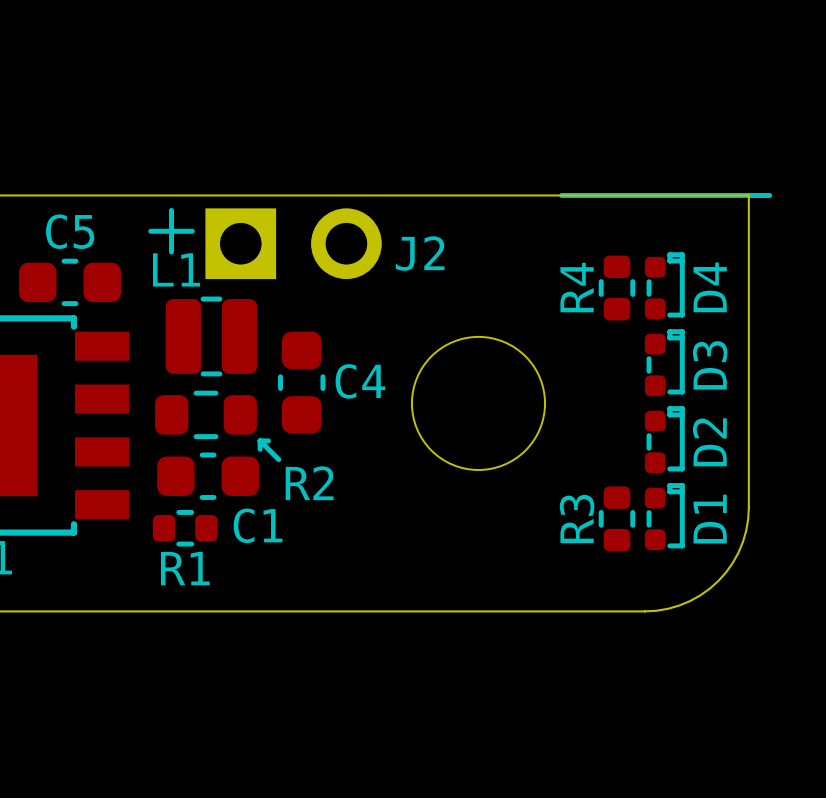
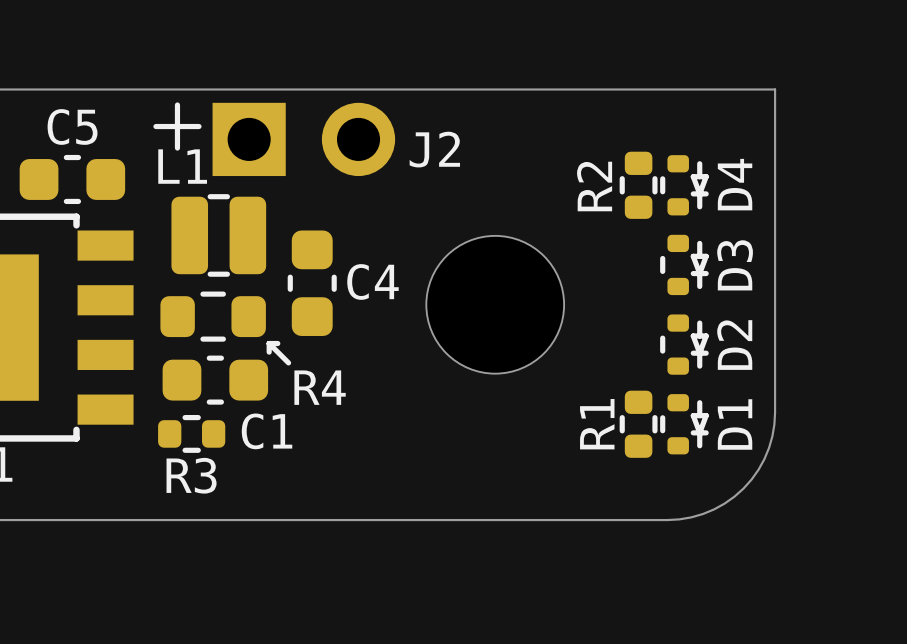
line: (561, 195) (769, 195) -> none
D4 footprint: [644, 252, 685, 320] -> [660, 155, 709, 216]
R4 name: R4 (577, 287) -> R2 (594, 186)
D3 footprint: [644, 329, 685, 397] -> [660, 234, 709, 296]
D2 footprint: [644, 406, 685, 474] -> [660, 314, 709, 375]
R2 name: R2 (309, 483) -> R4 (320, 387)
D1 footprint: [644, 483, 685, 551] -> [660, 394, 709, 455]
R3 name: R3 (577, 518) -> R1 (597, 424)
R1 name: R1 (185, 568) -> R3 (191, 475)

